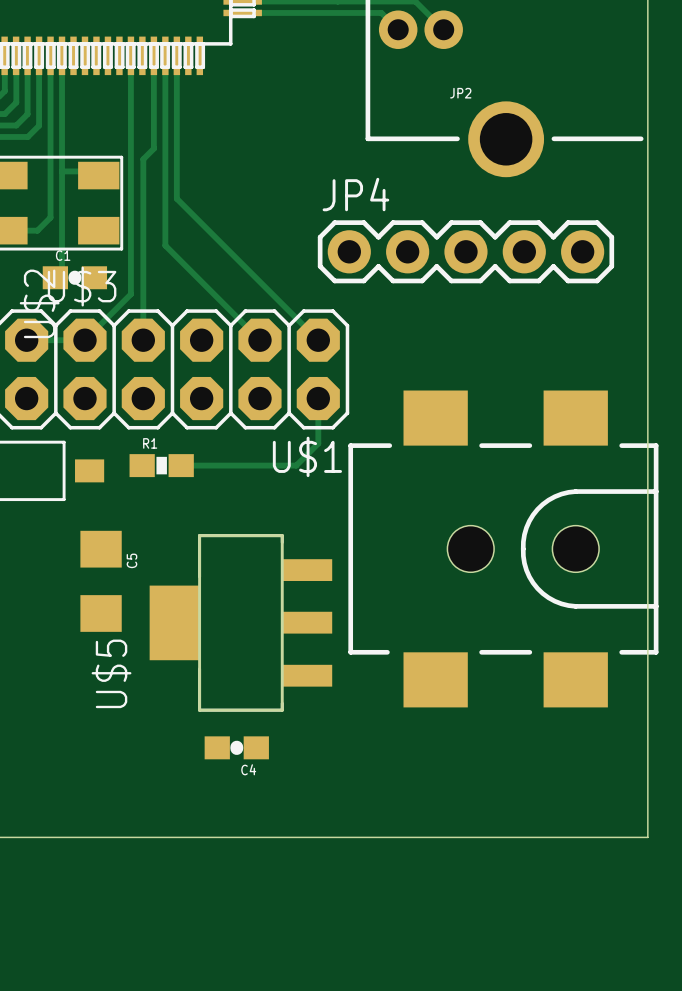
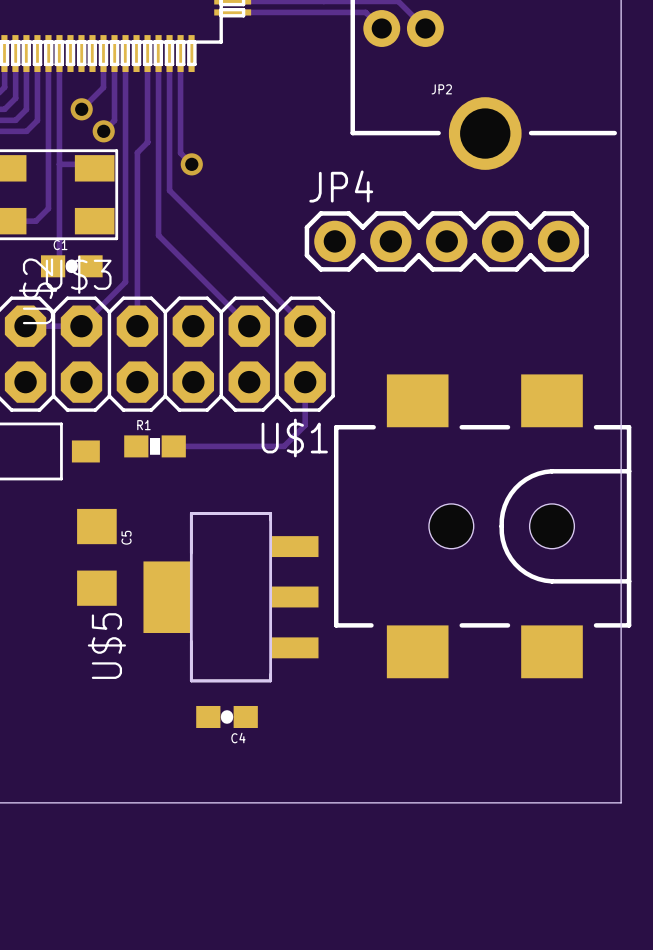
track: none -> (103, 53) (103, 87) (81, 109)
track: none -> (114, 53) (114, 120) (103, 131)
track: none -> (180, 53) (180, 153) (191, 164)
via: none -> (81, 109)
via: none -> (103, 131)
via: none -> (191, 164)

